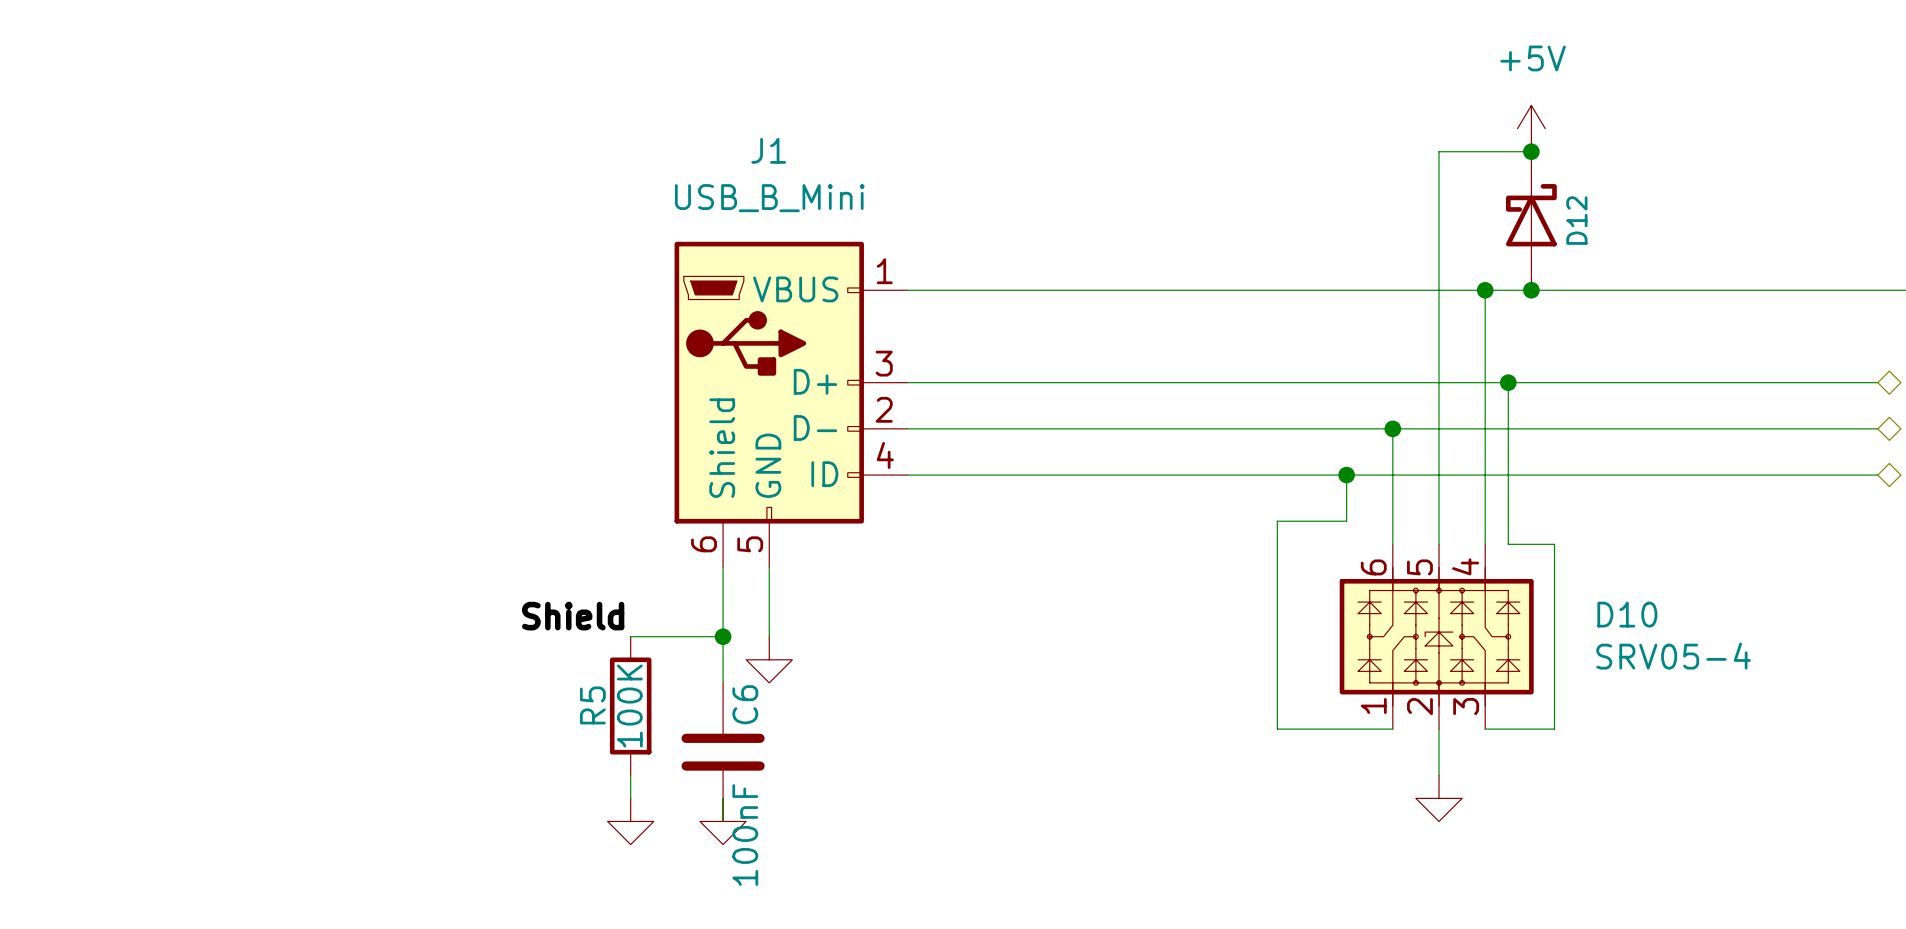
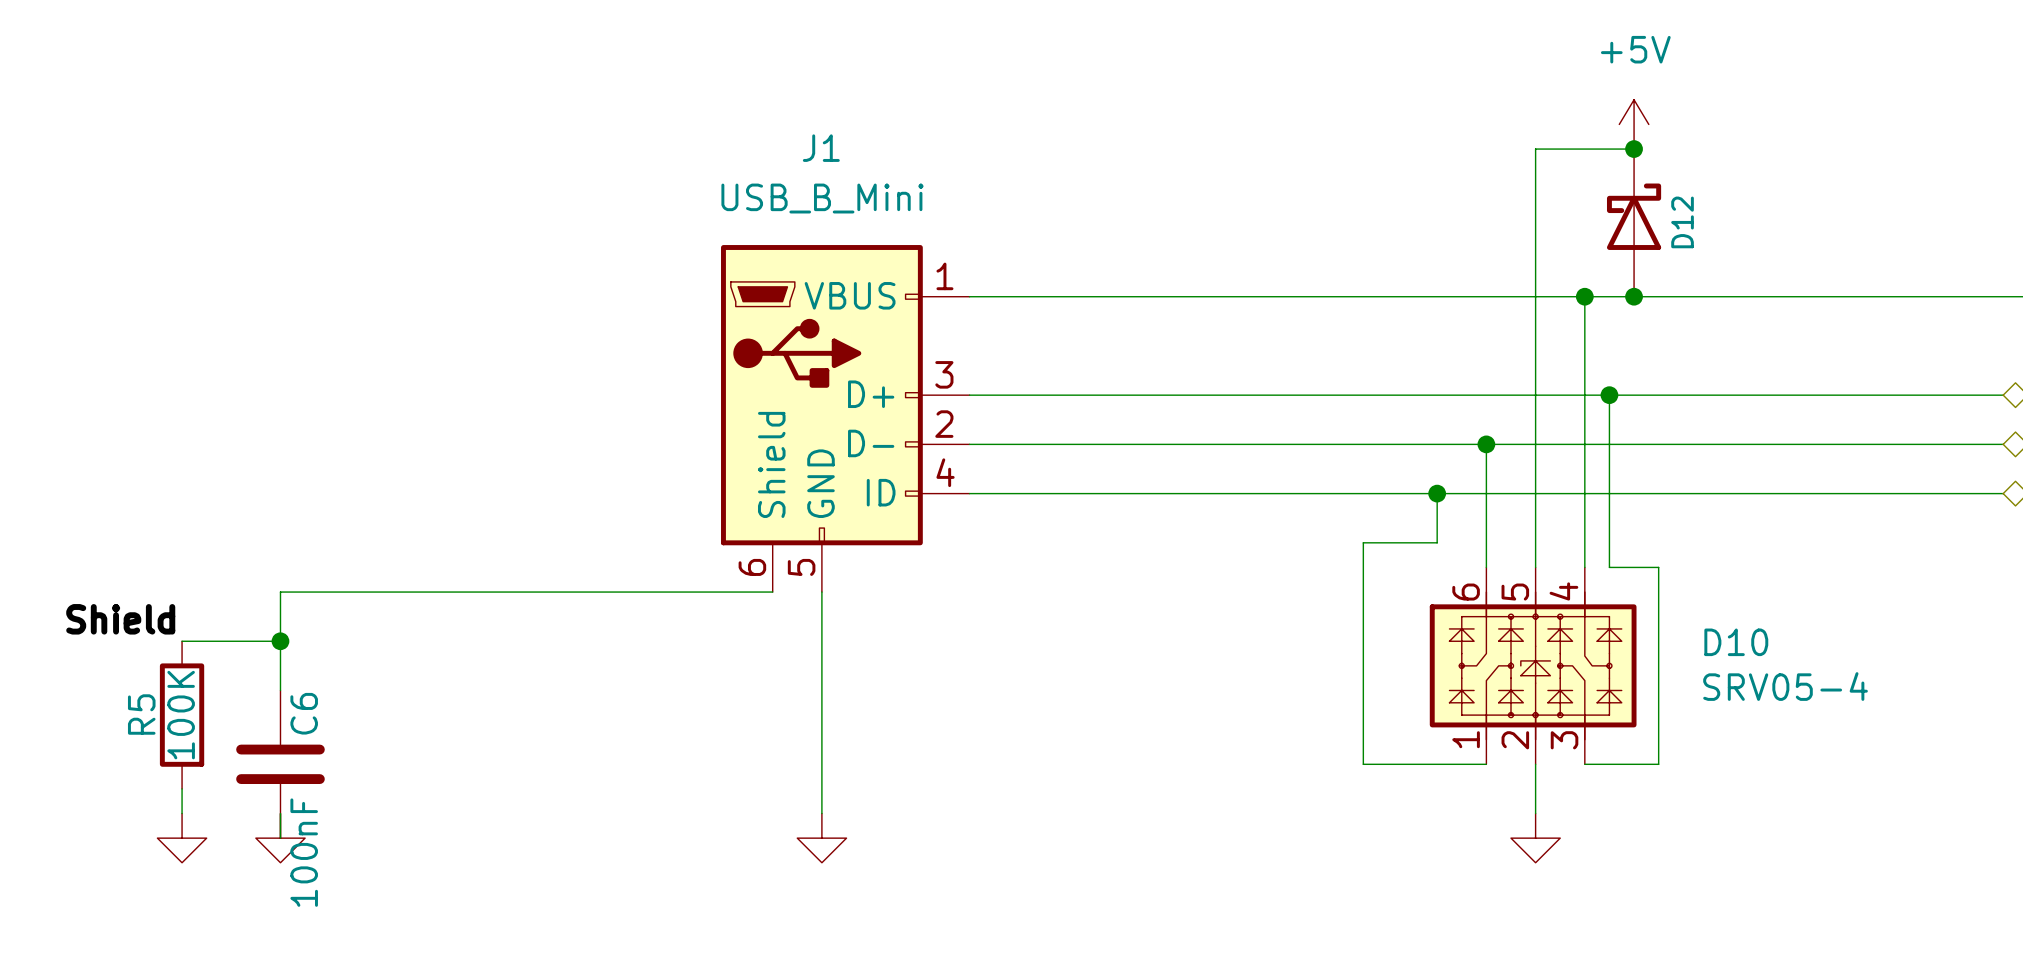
wire: (723, 567) (723, 682) -> (772, 592) (280, 592) (280, 690)
label: none -> Shield (120, 619)
wire: none -> (182, 641) (280, 641)
junction: none -> (280, 641)
label: Shield (573, 616) -> none
wire: (630, 636) (723, 636) -> none
junction: (723, 636) -> none
wire: none -> (821, 665) (821, 813)
power symbol: (769, 659) -> none
R5 position: (630, 705) -> (182, 715)
wire: none -> (182, 788) (182, 813)
C6 position: (723, 752) -> (280, 764)
wire: (630, 775) (630, 798) -> (280, 813) (280, 838)
power symbol: none -> (182, 838)
power symbol: none -> (280, 838)
wire: (723, 798) (723, 821) -> none
power symbol: (630, 821) -> none
power symbol position: (723, 821) -> (821, 838)

